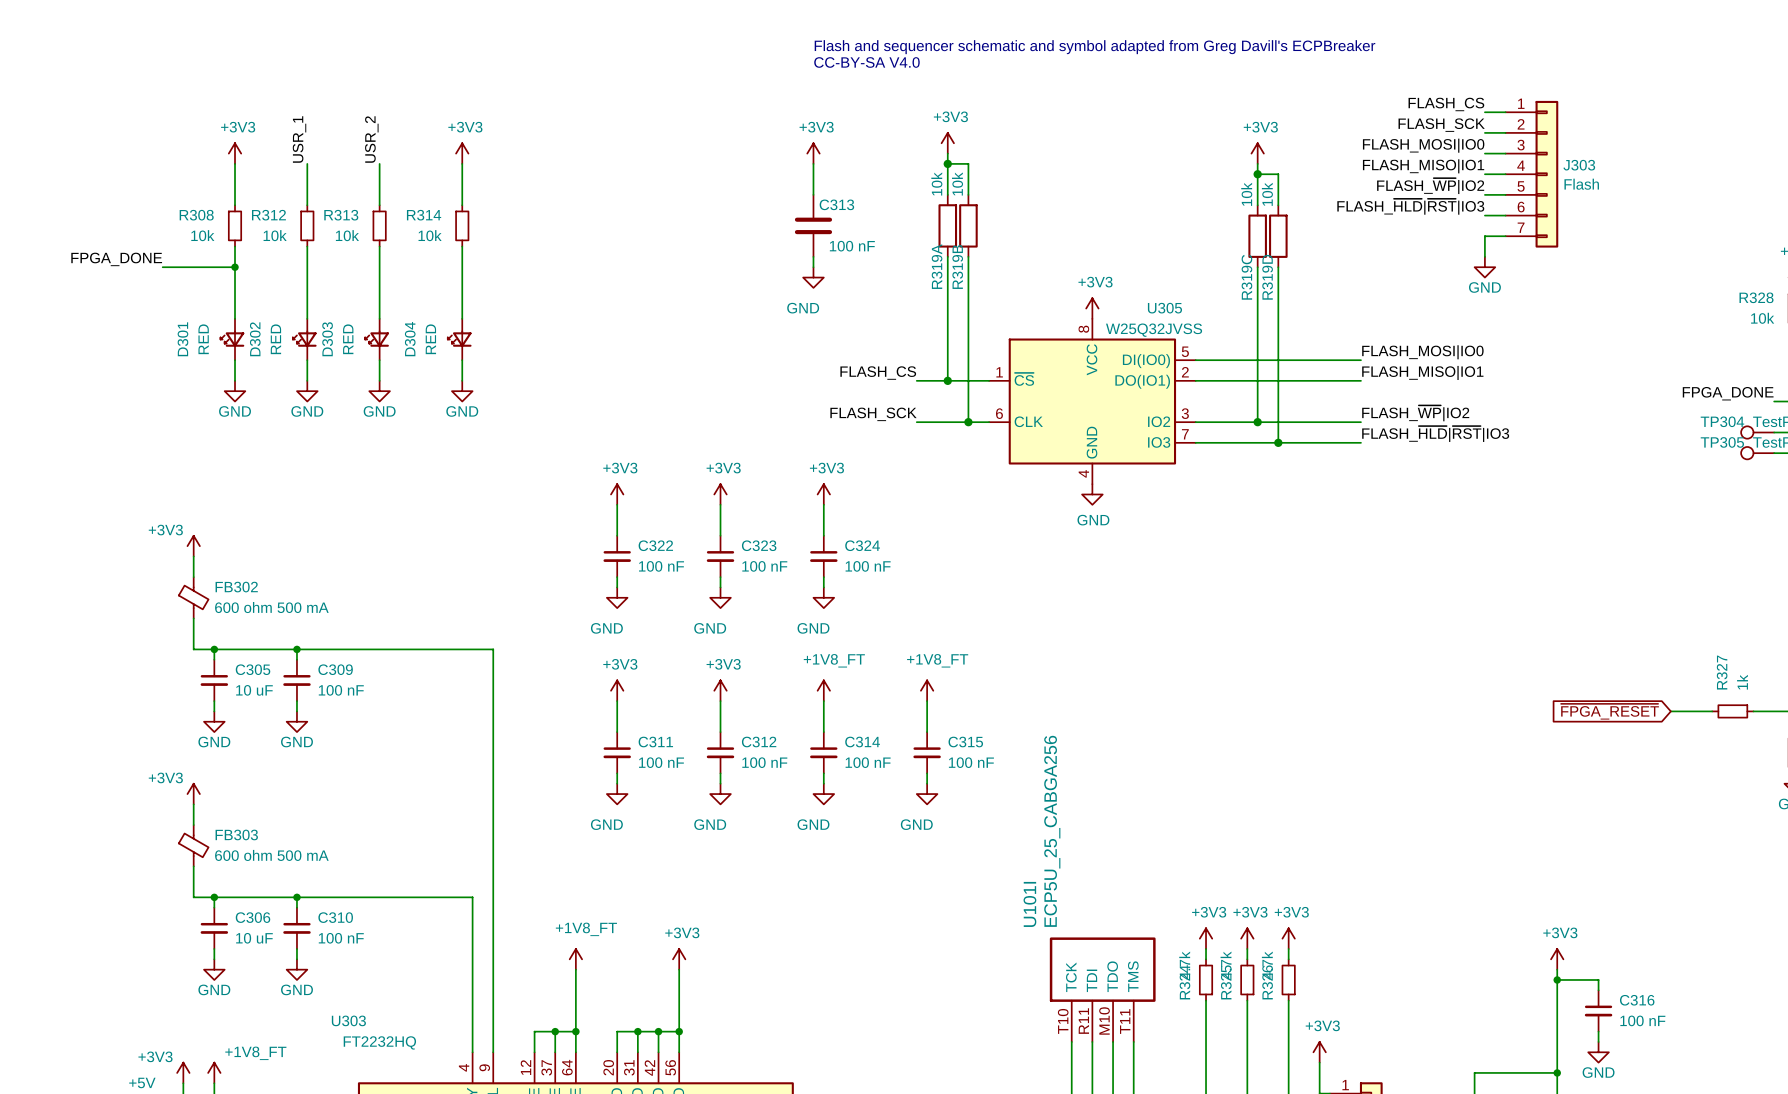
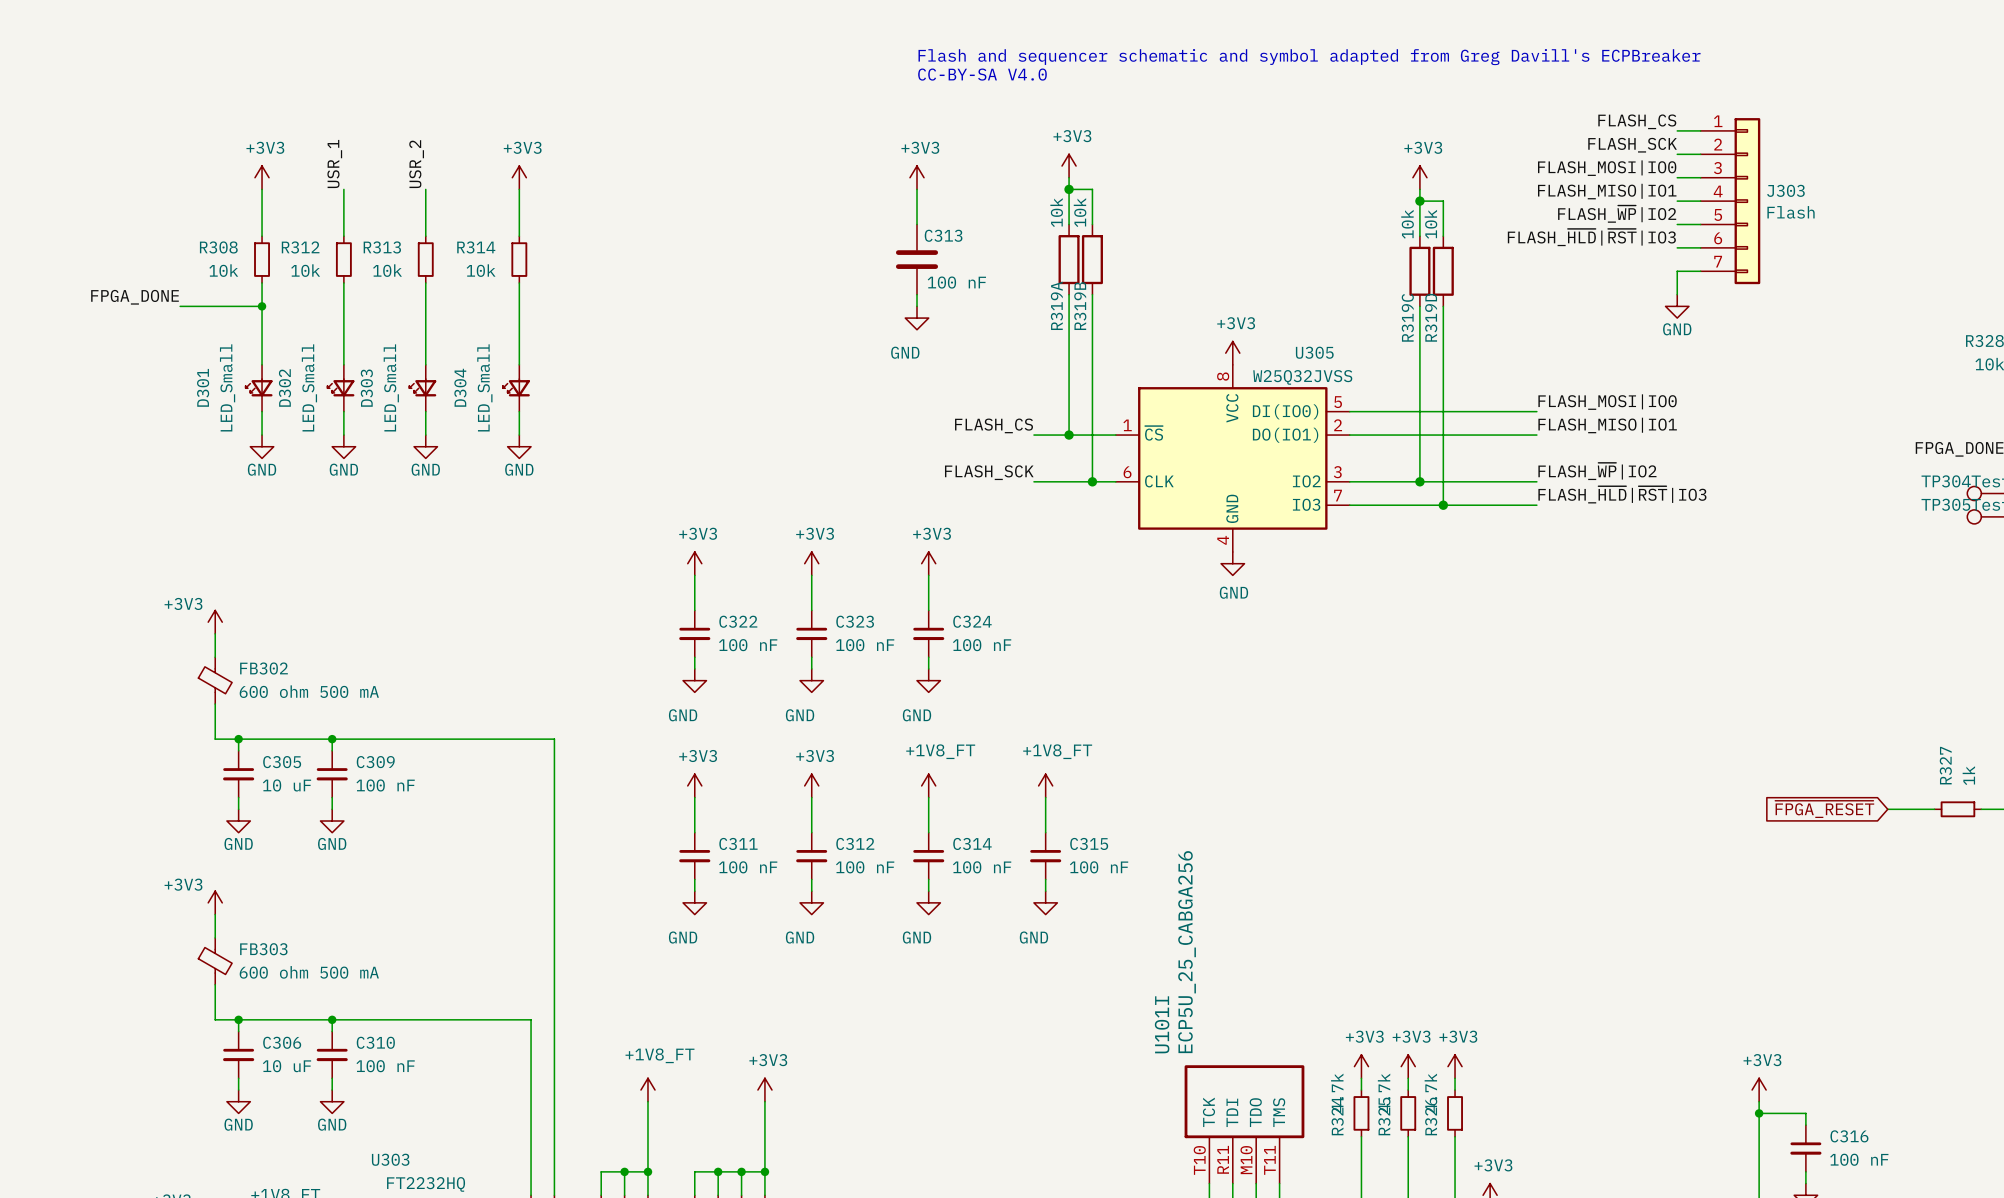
D301 value: RED (203, 339) -> LED_Small (227, 387)
D302 value: RED (275, 339) -> LED_Small (309, 387)
D303 value: RED (348, 339) -> LED_Small (391, 387)
D304 value: RED (430, 339) -> LED_Small (484, 387)

